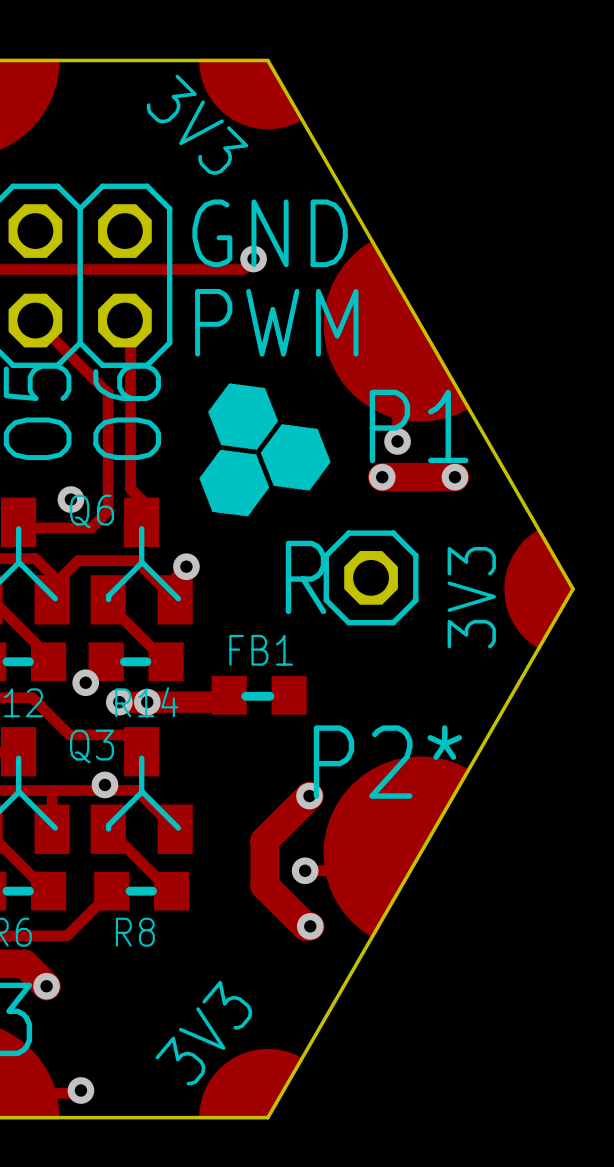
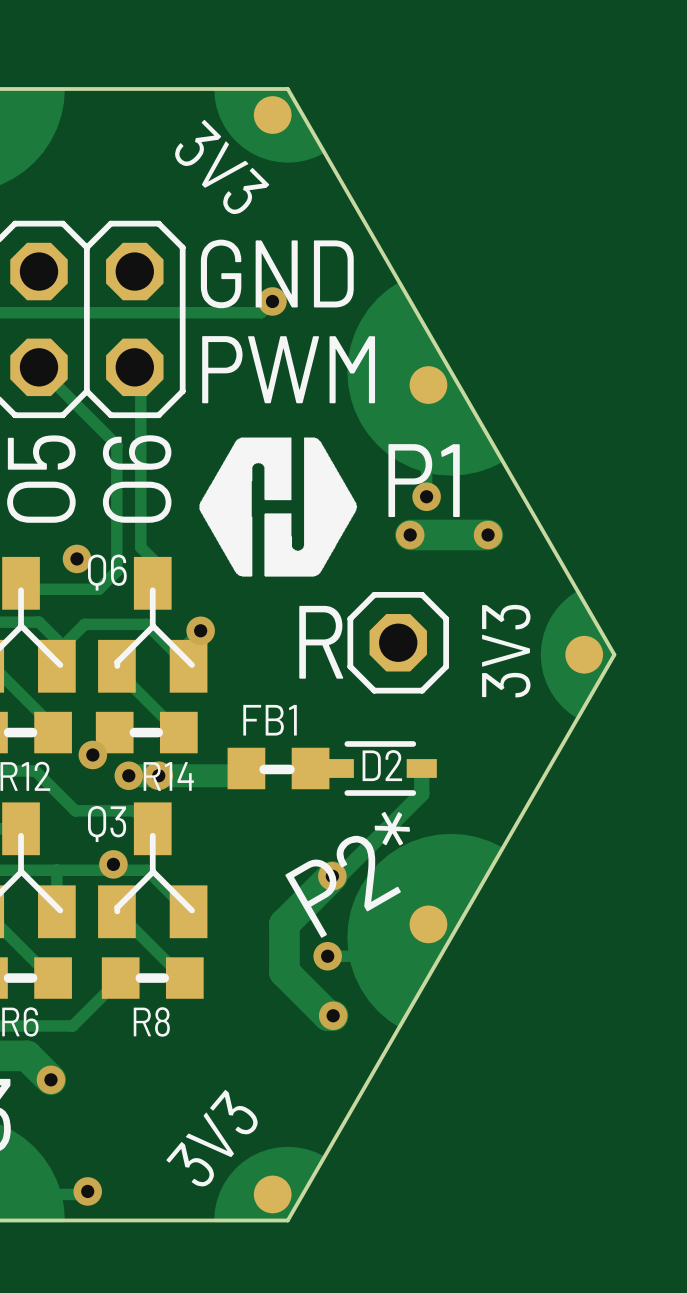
drawing: [199, 383, 331, 517] -> none
drawing: none -> [199, 437, 357, 577]
D2: none -> (380, 768)
track: none -> (421, 768) (421, 794) (339, 876) (332, 876)
text rotation: 0° (387, 762) -> 30° counterclockwise (347, 874)

